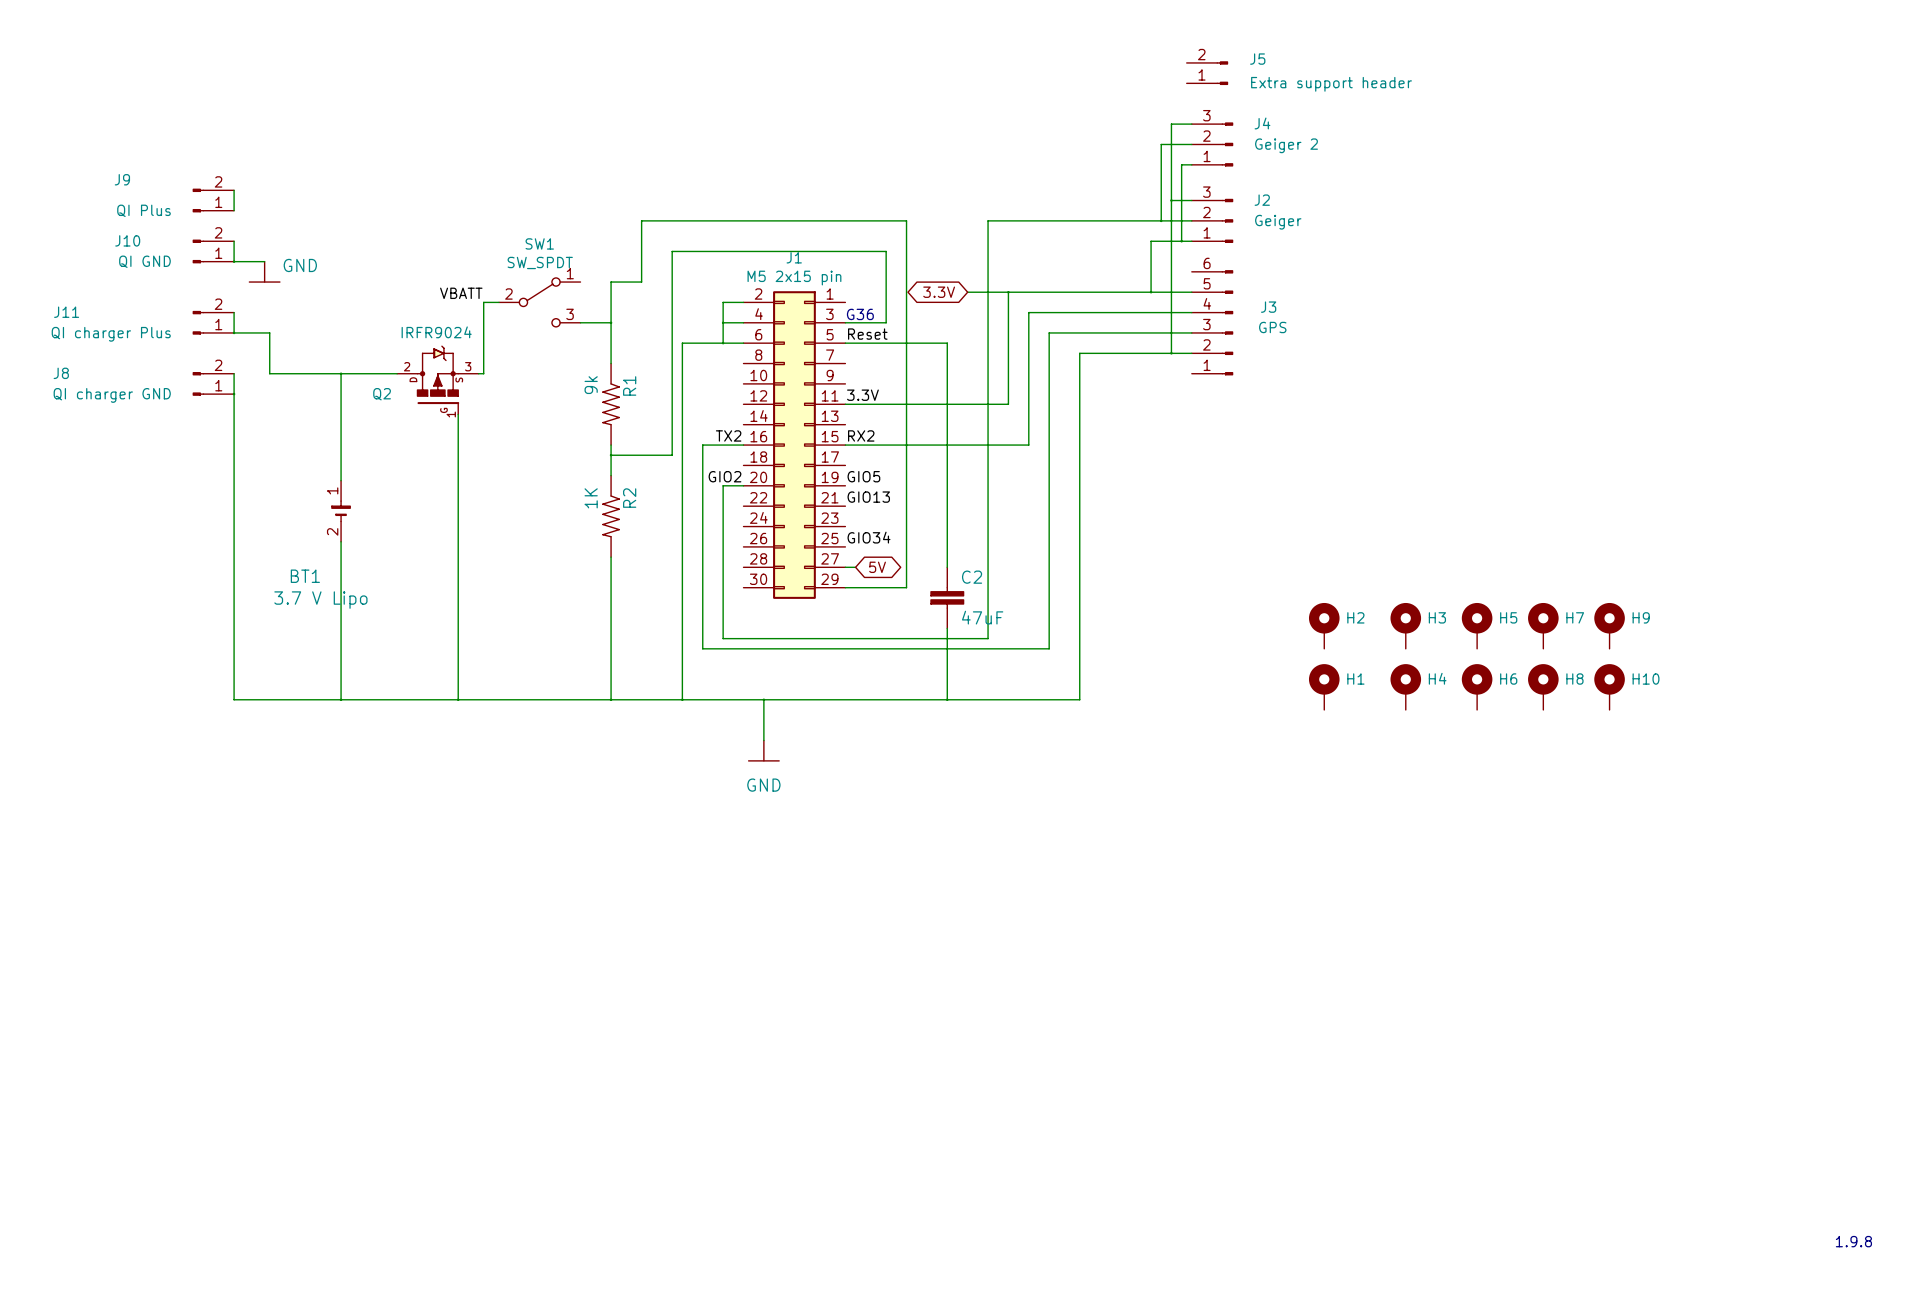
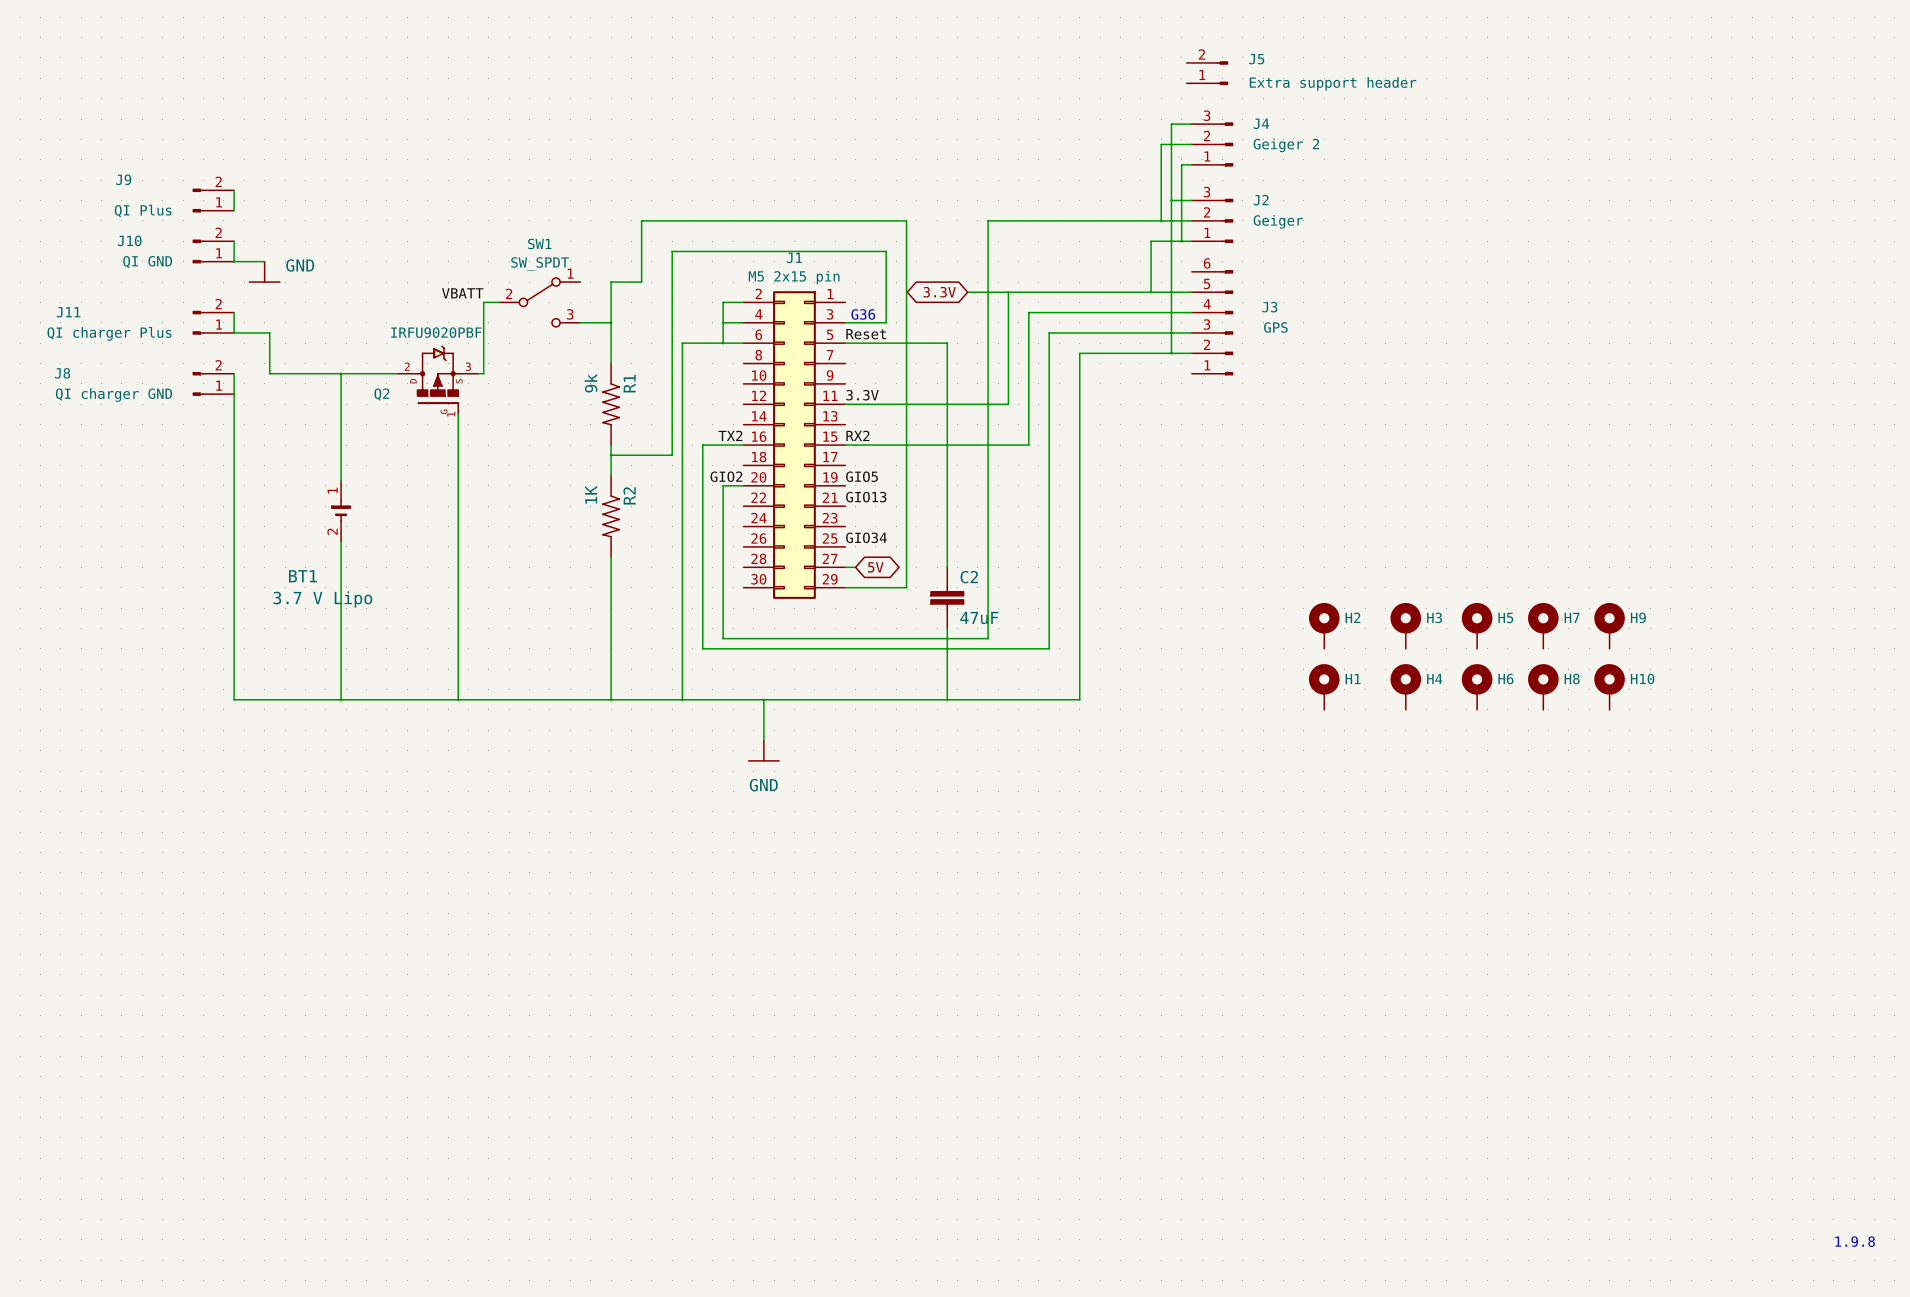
Q2 value: IRFR9024 (436, 332) -> IRFU9020PBF (436, 332)

